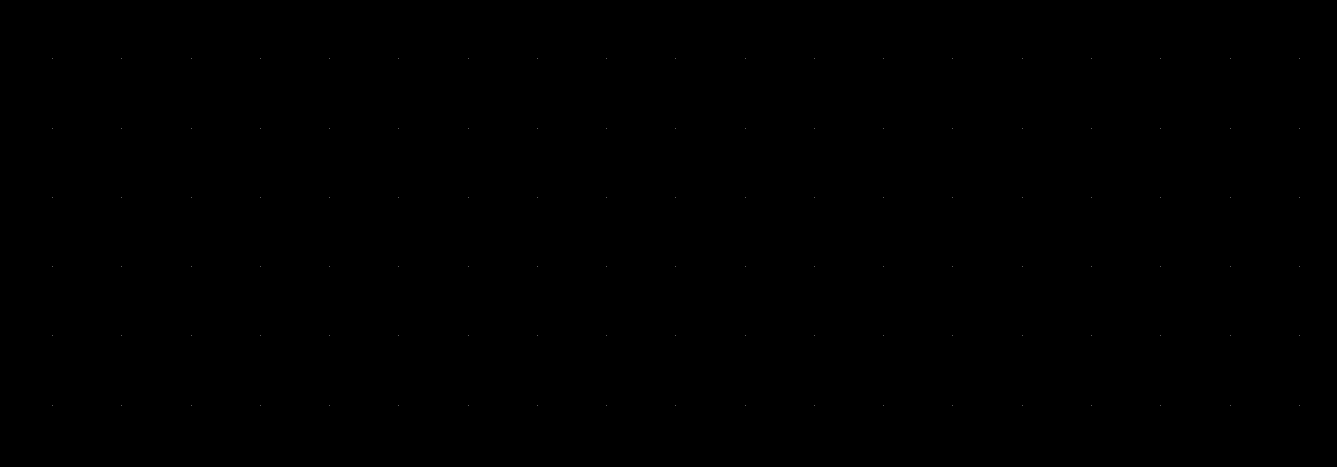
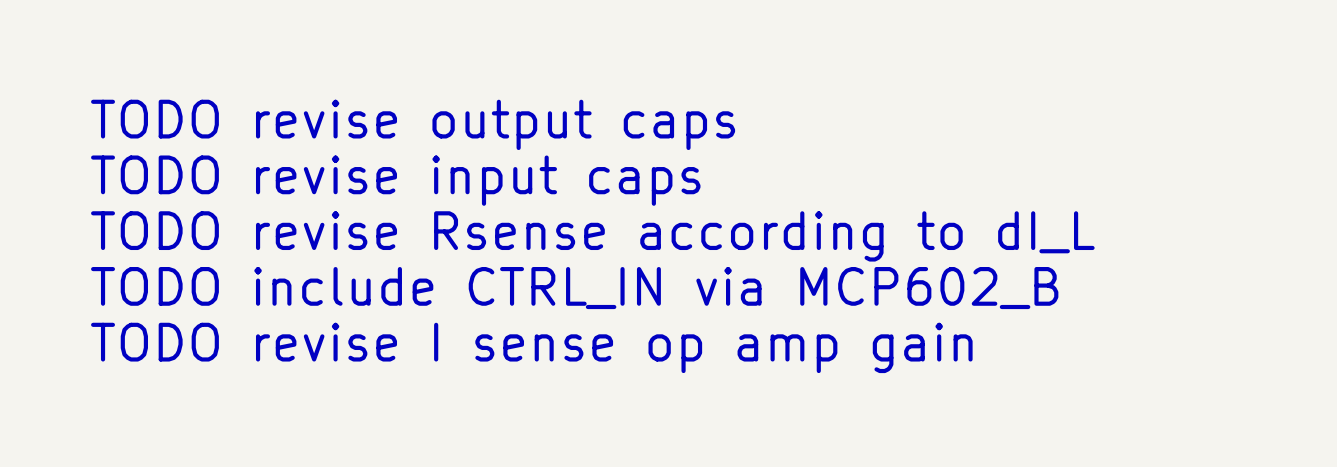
text: none -> TODO revise output caps (413, 124)
text: none -> TODO revise input caps (395, 180)
text: none -> TODO revise Rsense according to dI_L (592, 236)
text: none -> TODO include CTRL_IN via MCP602_B (574, 288)
text: none -> TODO revise I sense op amp gain (531, 347)

